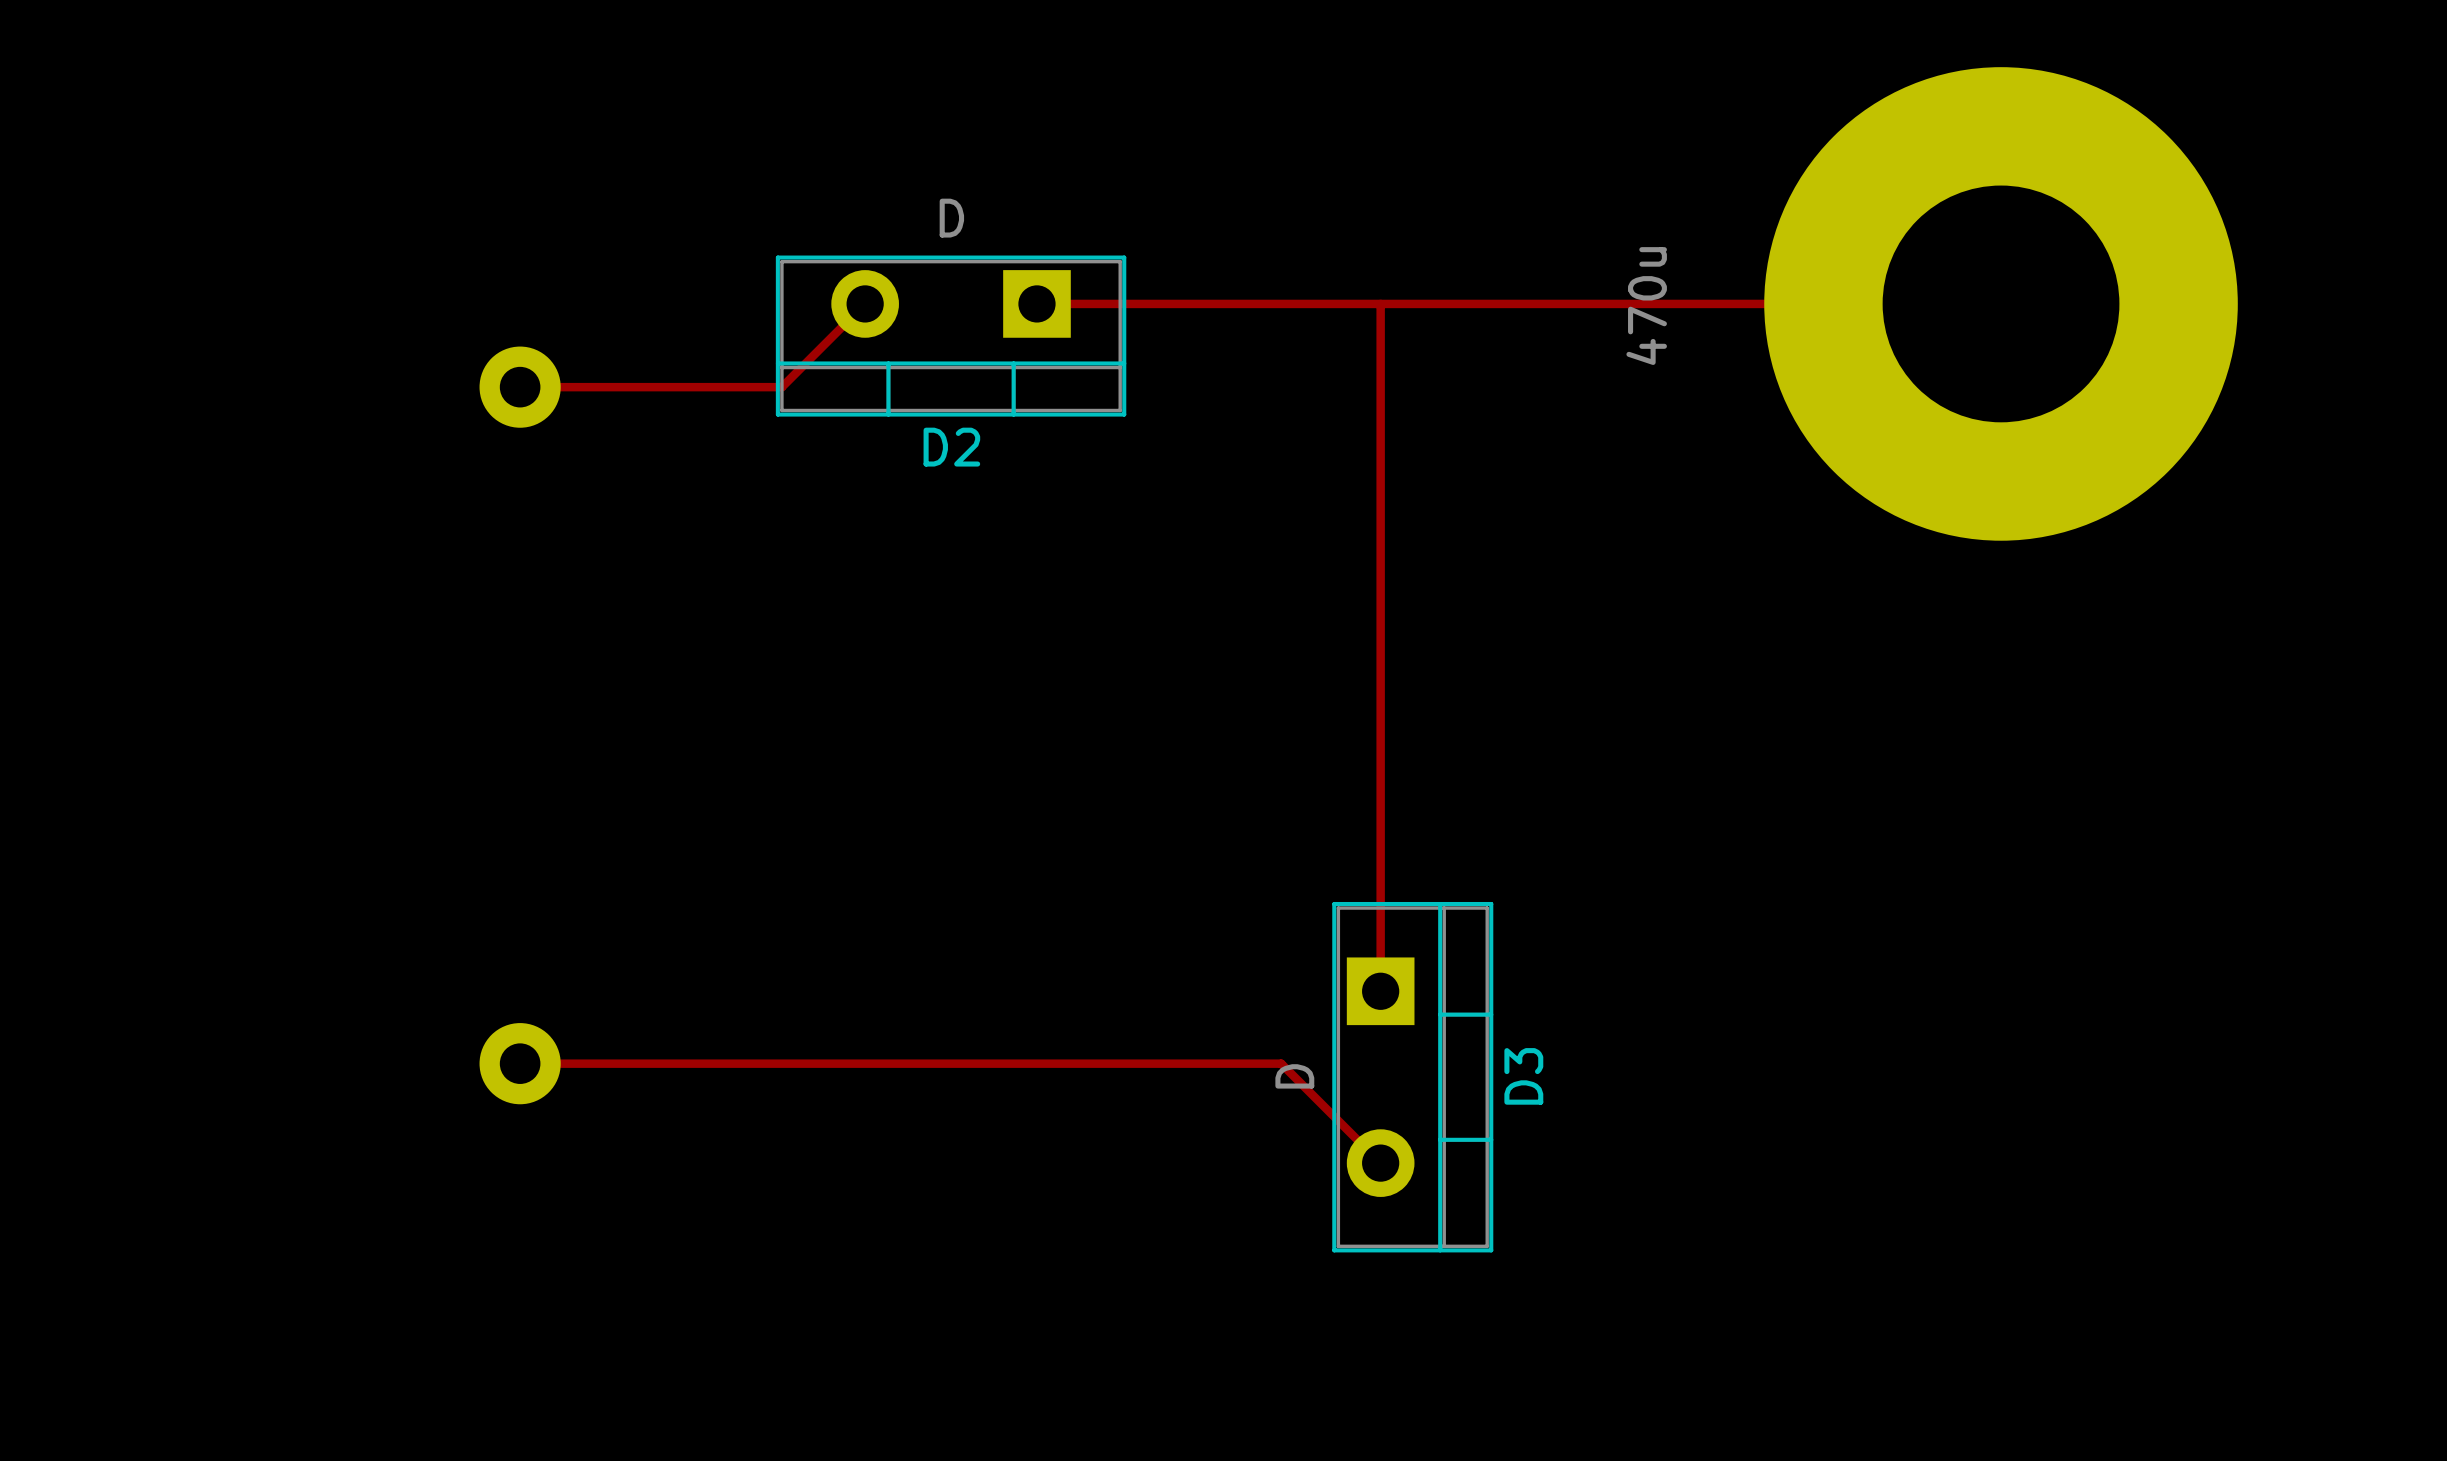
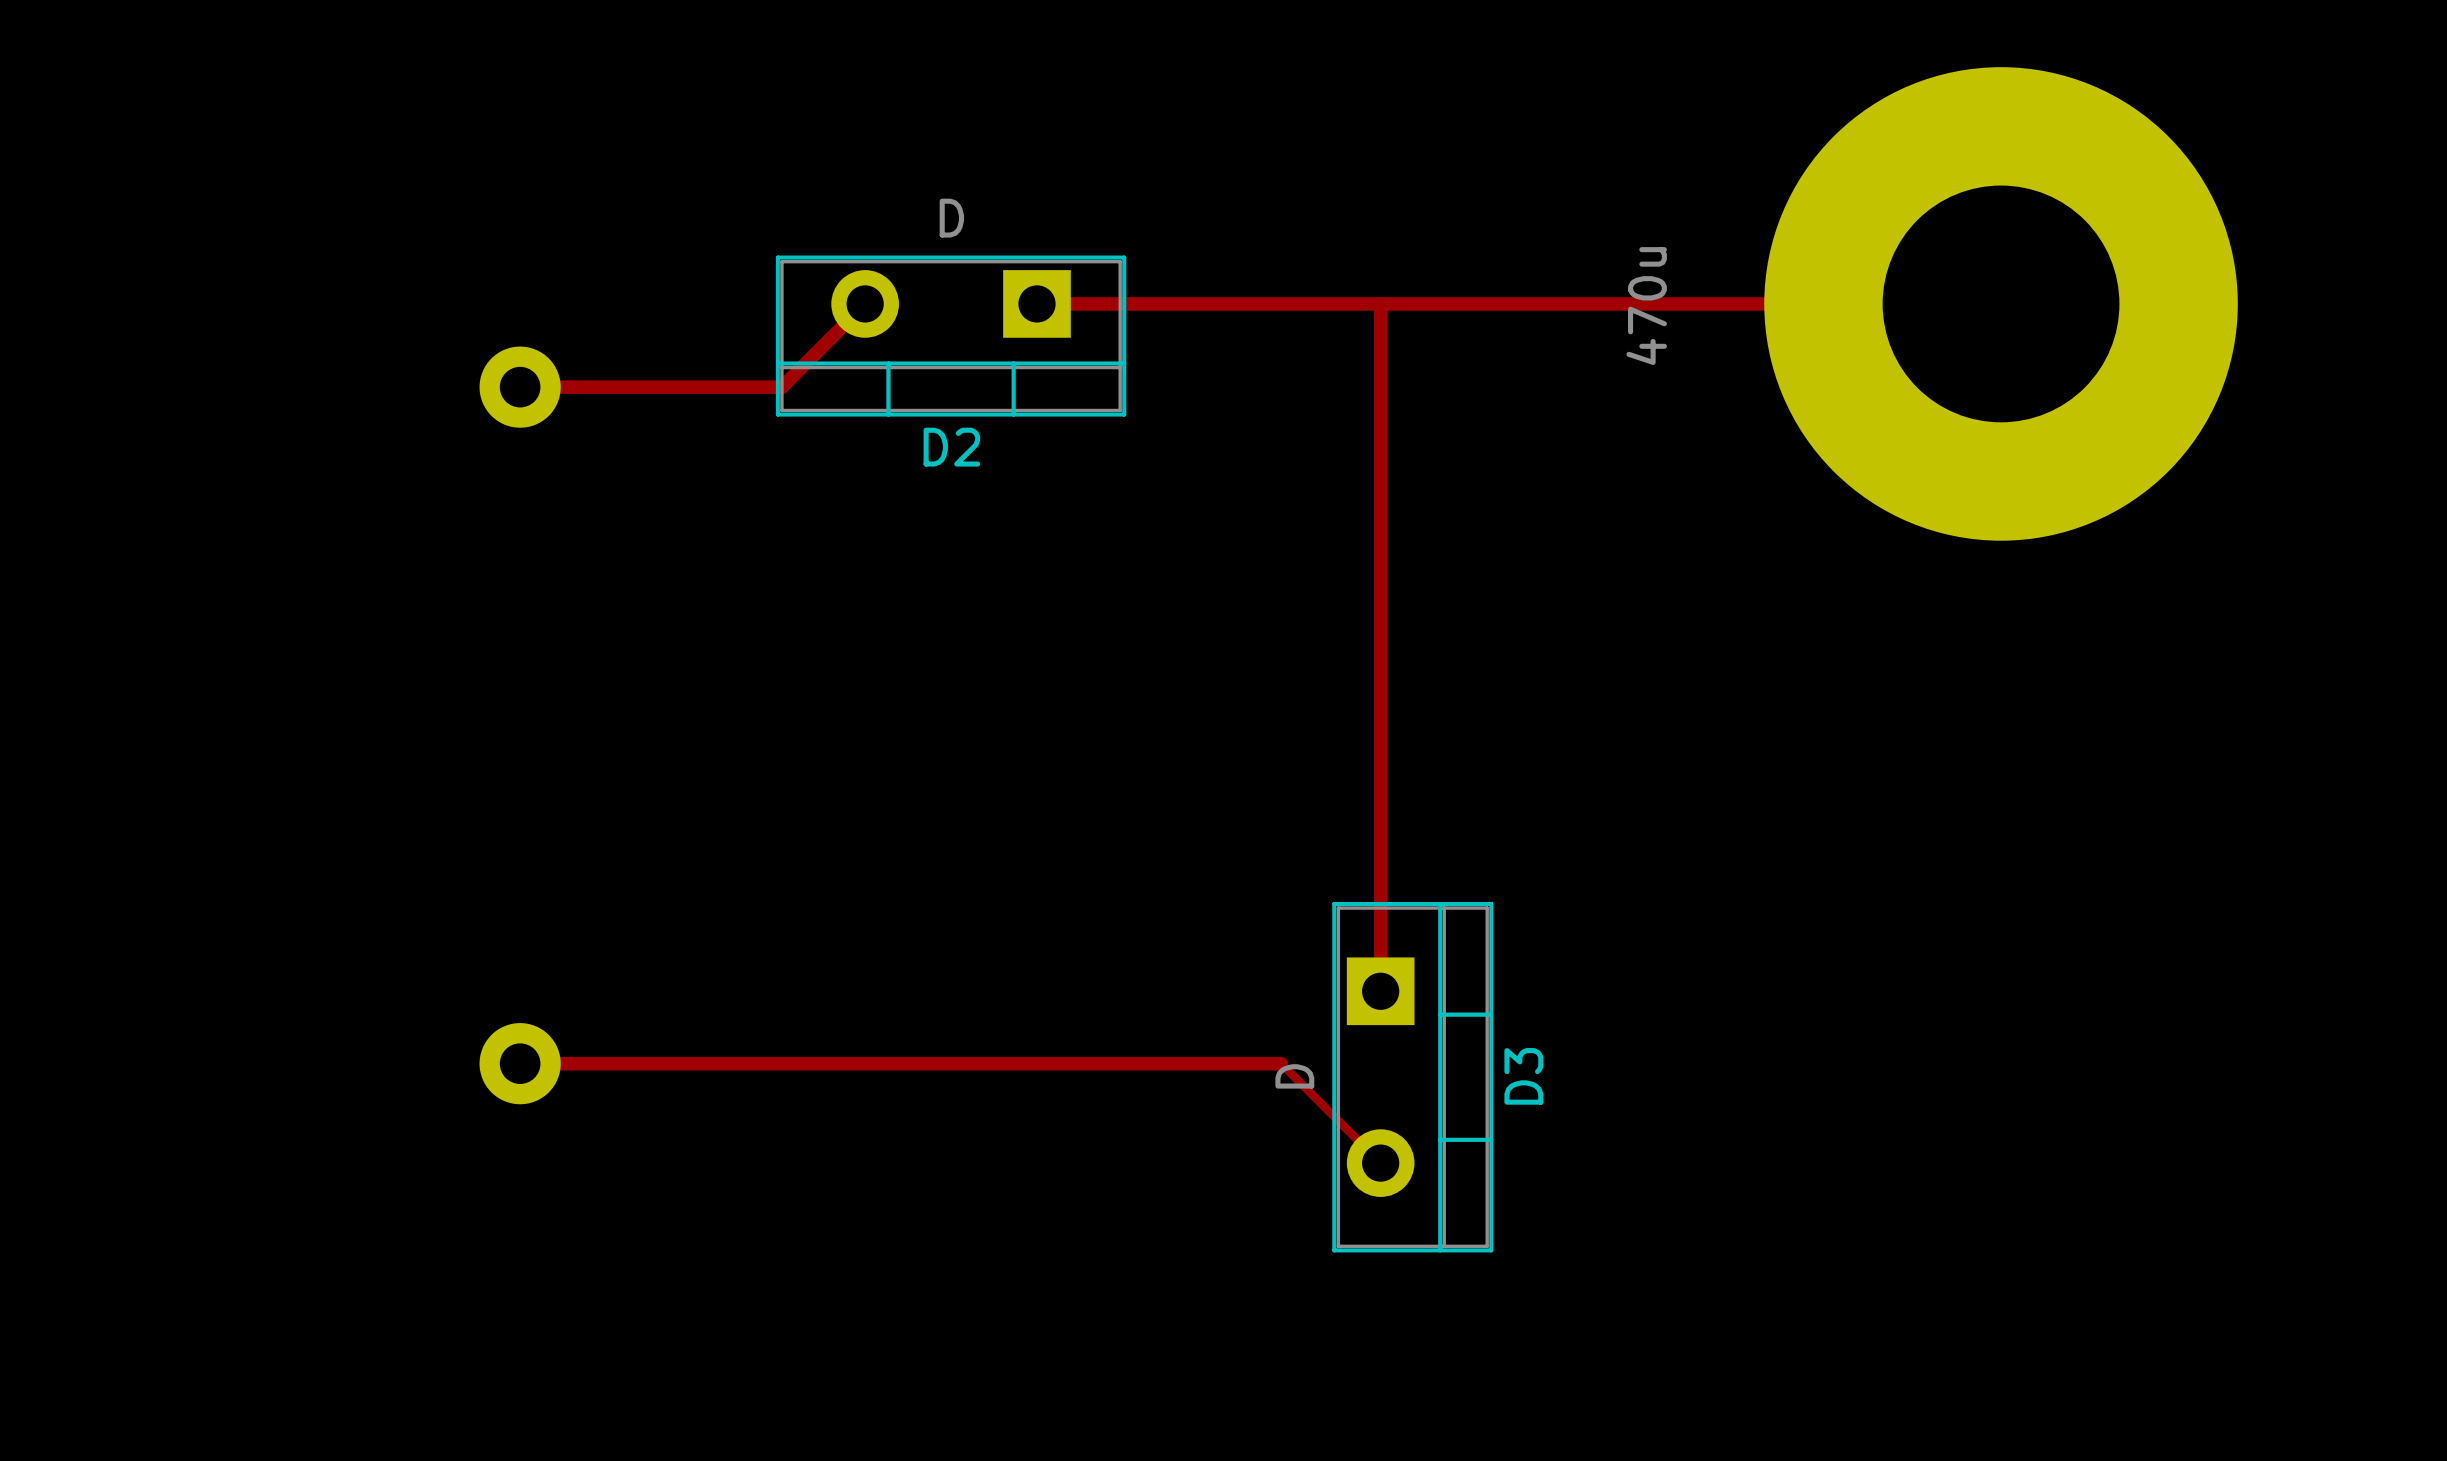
track width: thin (865, 303) (781, 387) (520, 387) -> thick (865, 303) (781, 387) (520, 387)
track width: thin (1036, 303) (2001, 303) -> thick (1036, 303) (2001, 303)
track width: thin (1380, 303) (1380, 991) -> thick (1380, 303) (1380, 991)
track width: thin (520, 1063) (1281, 1063) -> thick (520, 1063) (1281, 1063)

